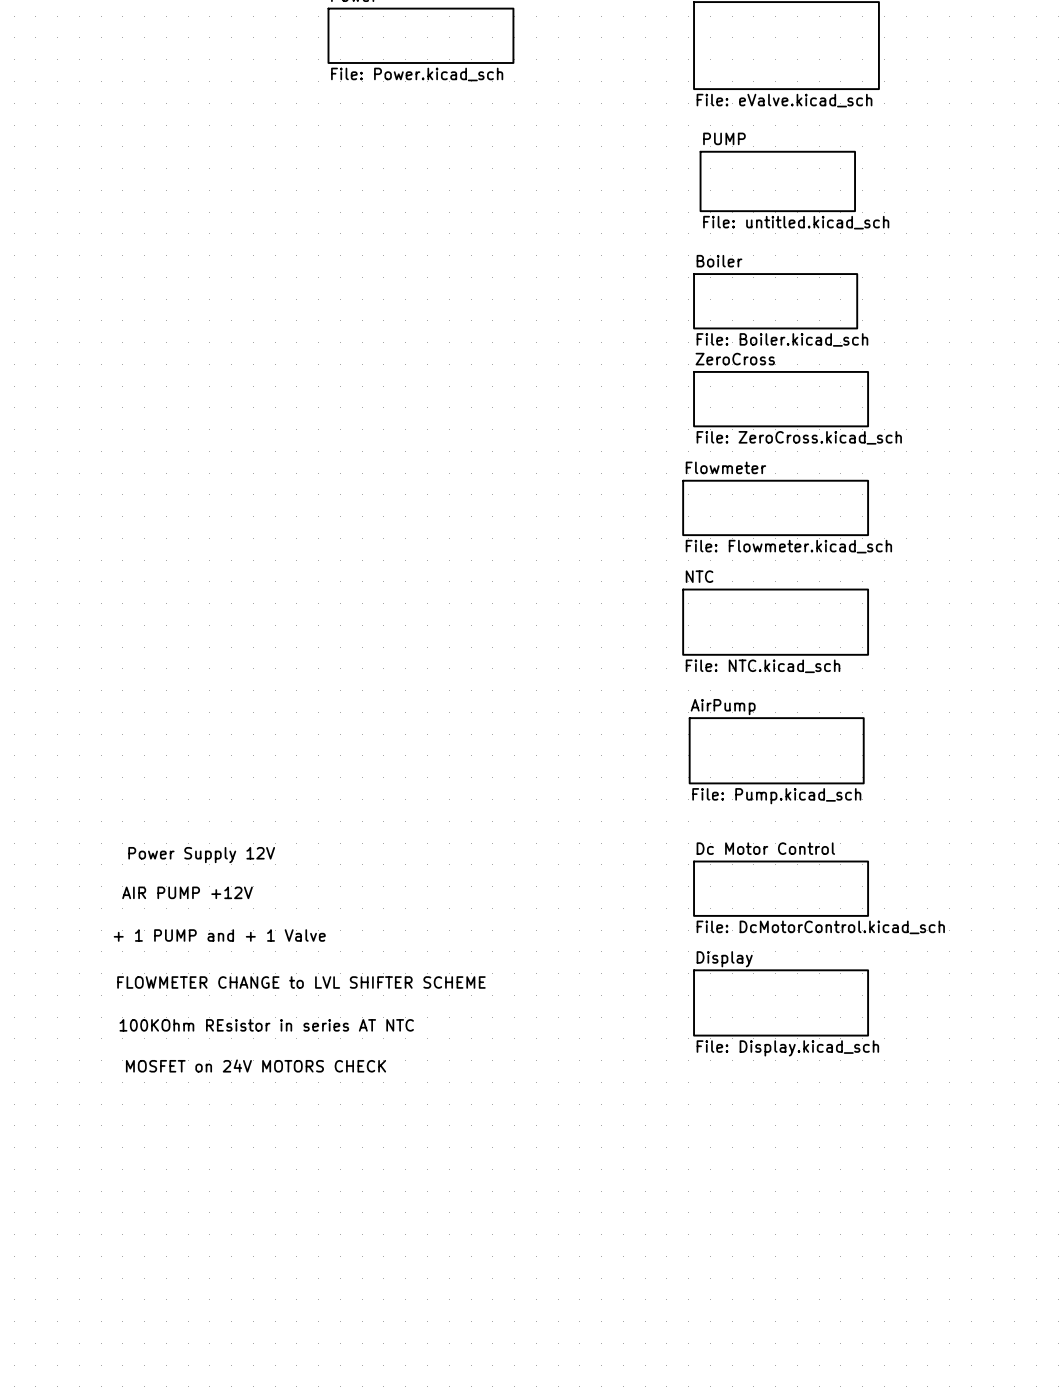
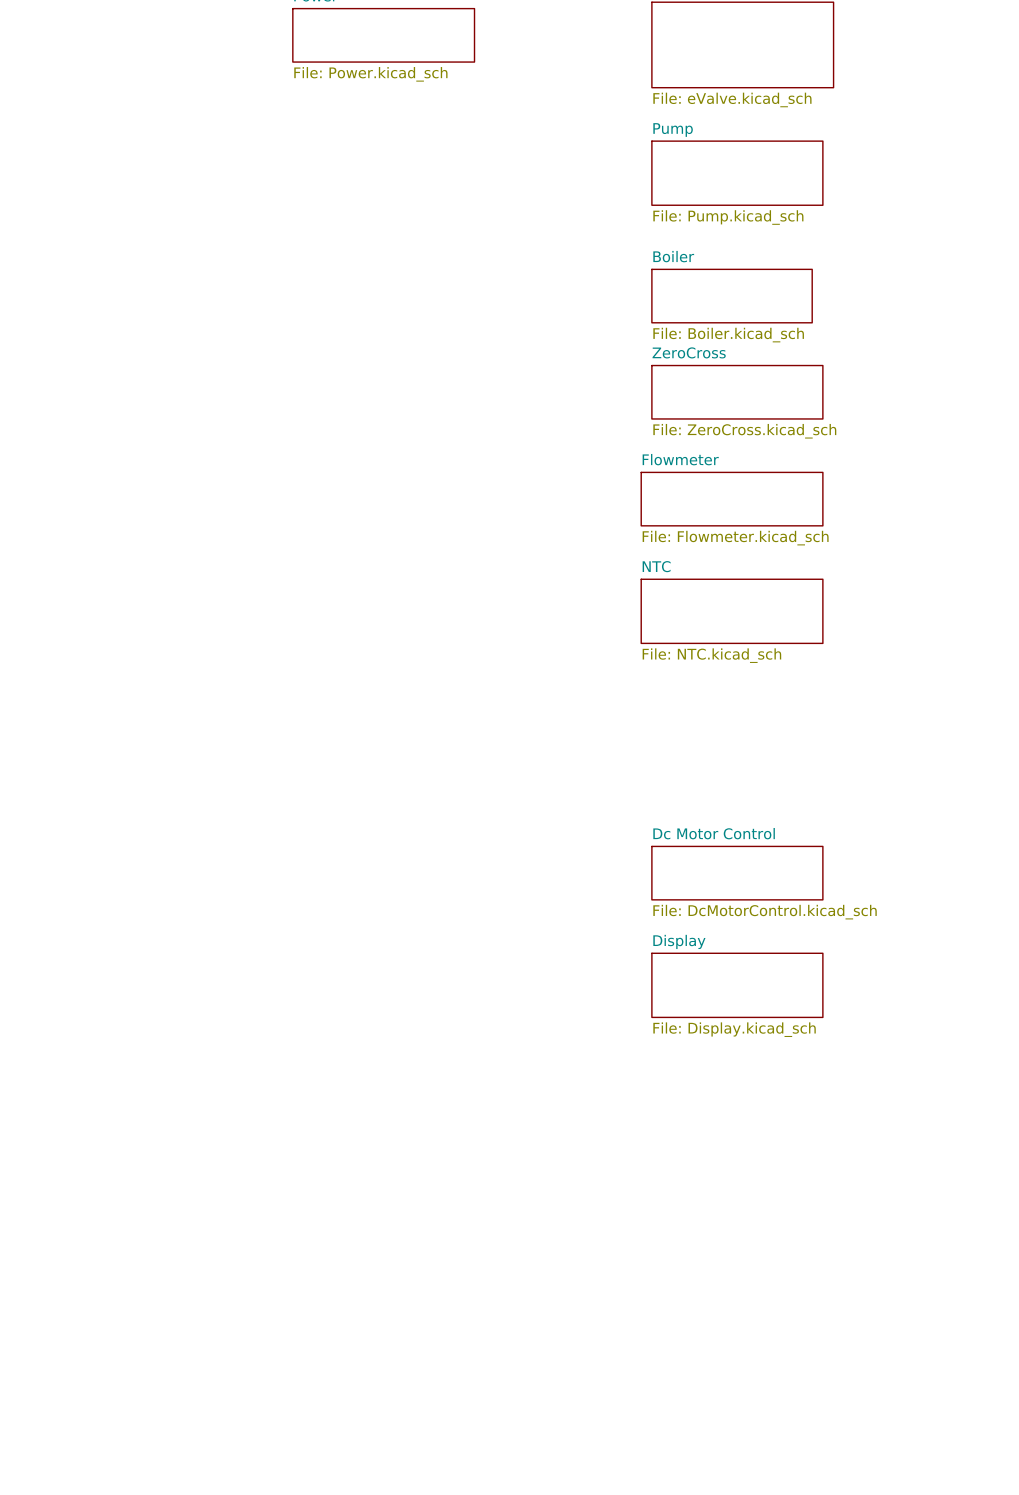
sheet Pump: none -> File: Pump.kicad_sch (737, 173)
sheet PUMP: File: untitled.kicad_sch (777, 181) -> none
sheet AirPump: File: Pump.kicad_sch (776, 750) -> none
text: Power Supply 12V (201, 855) -> none
text: AIR PUMP +12V (187, 892) -> none
text: + 1 PUMP and + 1 Valve (219, 935) -> none
text: FLOWMETER CHANGE to LVL SHIFTER SCHEME (301, 982) -> none
text: 100KOhm REsistor in series AT NTC (266, 1025) -> none
text: MOSFET on 24V MOTORS CHECK (256, 1066) -> none

